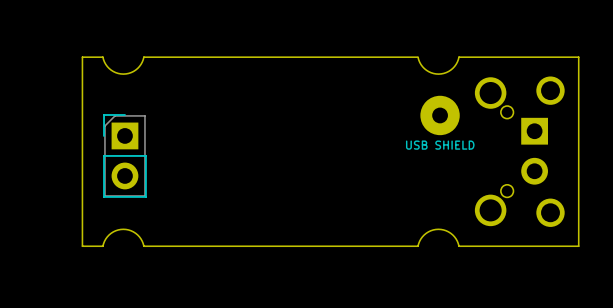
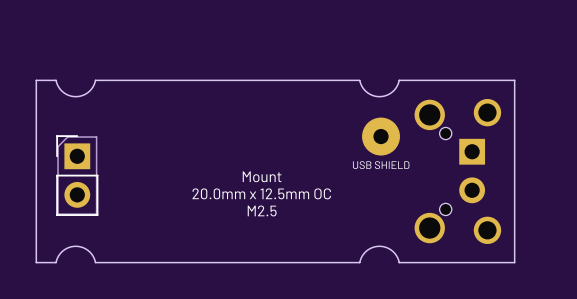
text: none -> Mount (262, 176)
text: none -> 20.0mm x 12.5mm OC (261, 193)
text: none -> M2.5 (262, 210)

